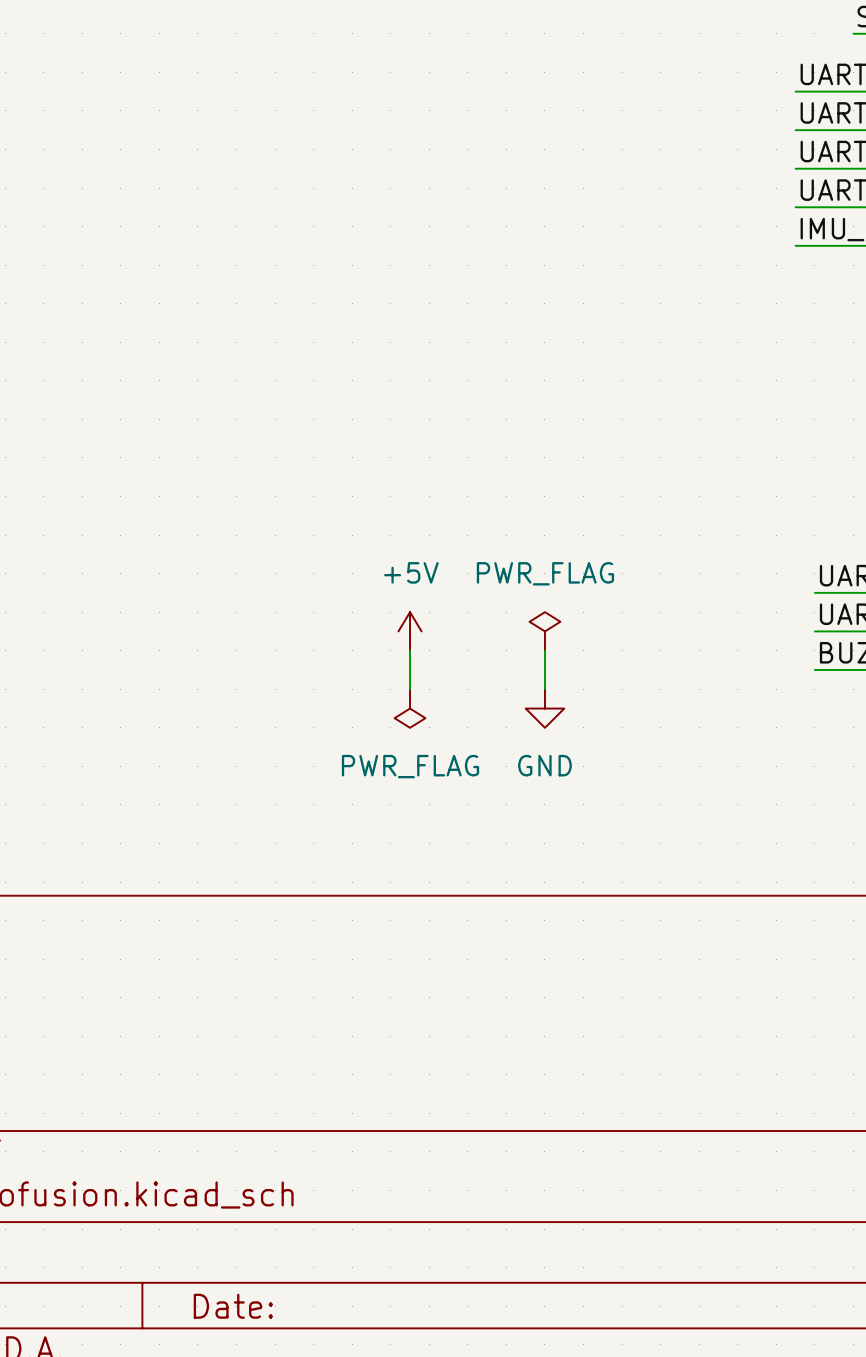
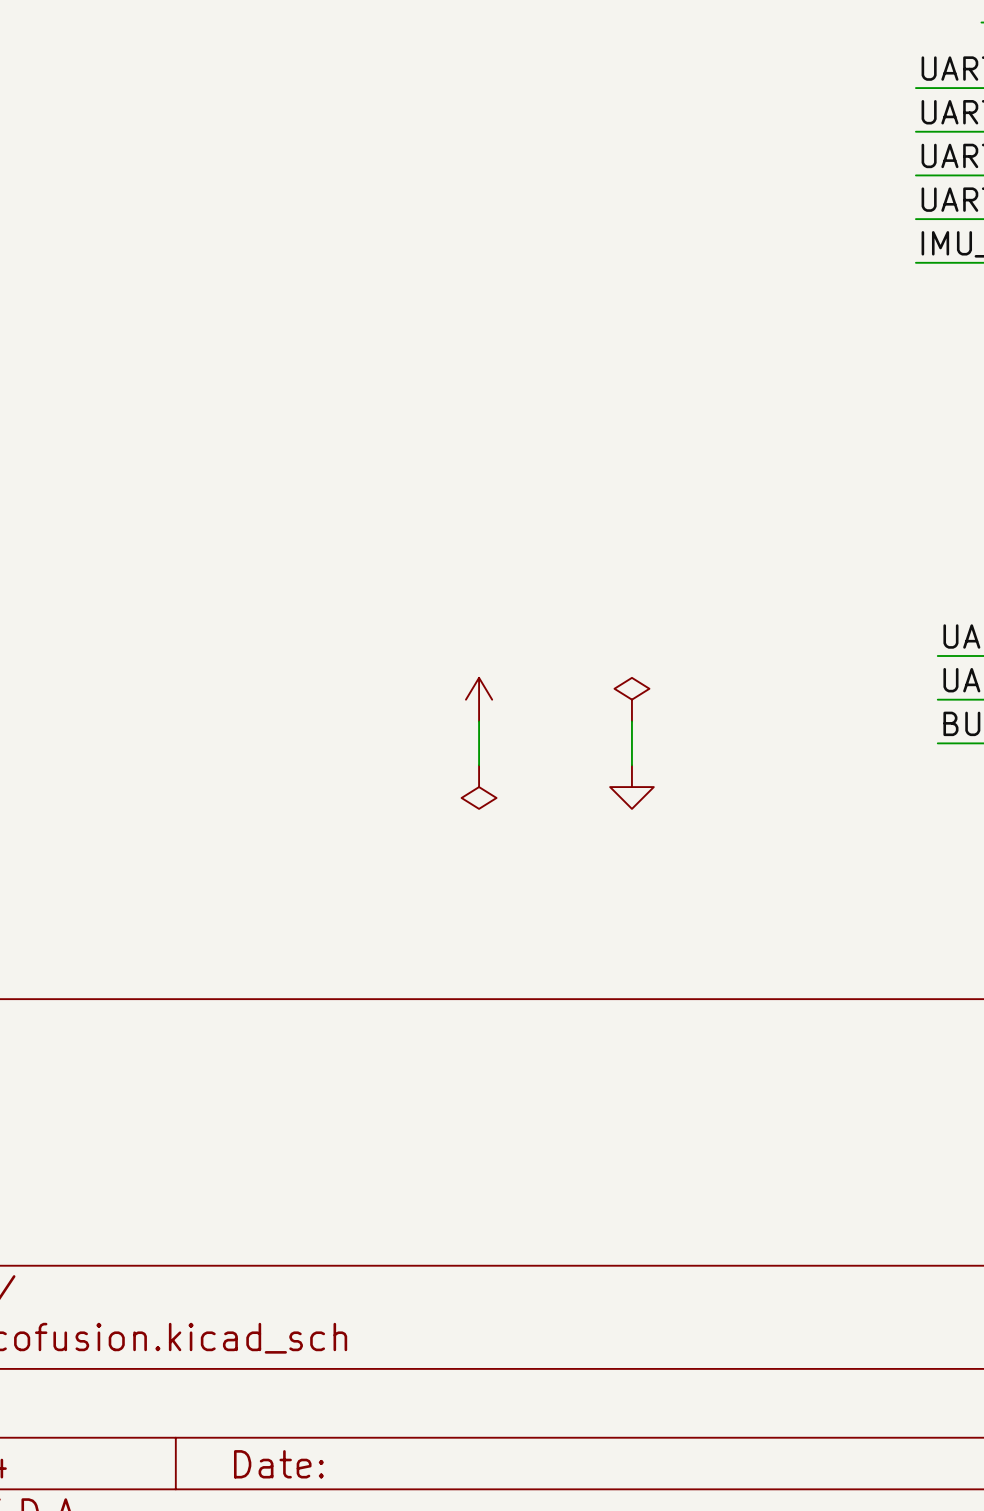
power symbol text: +5V (411, 572) -> none
power symbol text: PWR_FLAG (545, 573) -> none
power symbol text: GND (544, 765) -> none
power symbol text: PWR_FLAG (410, 766) -> none

